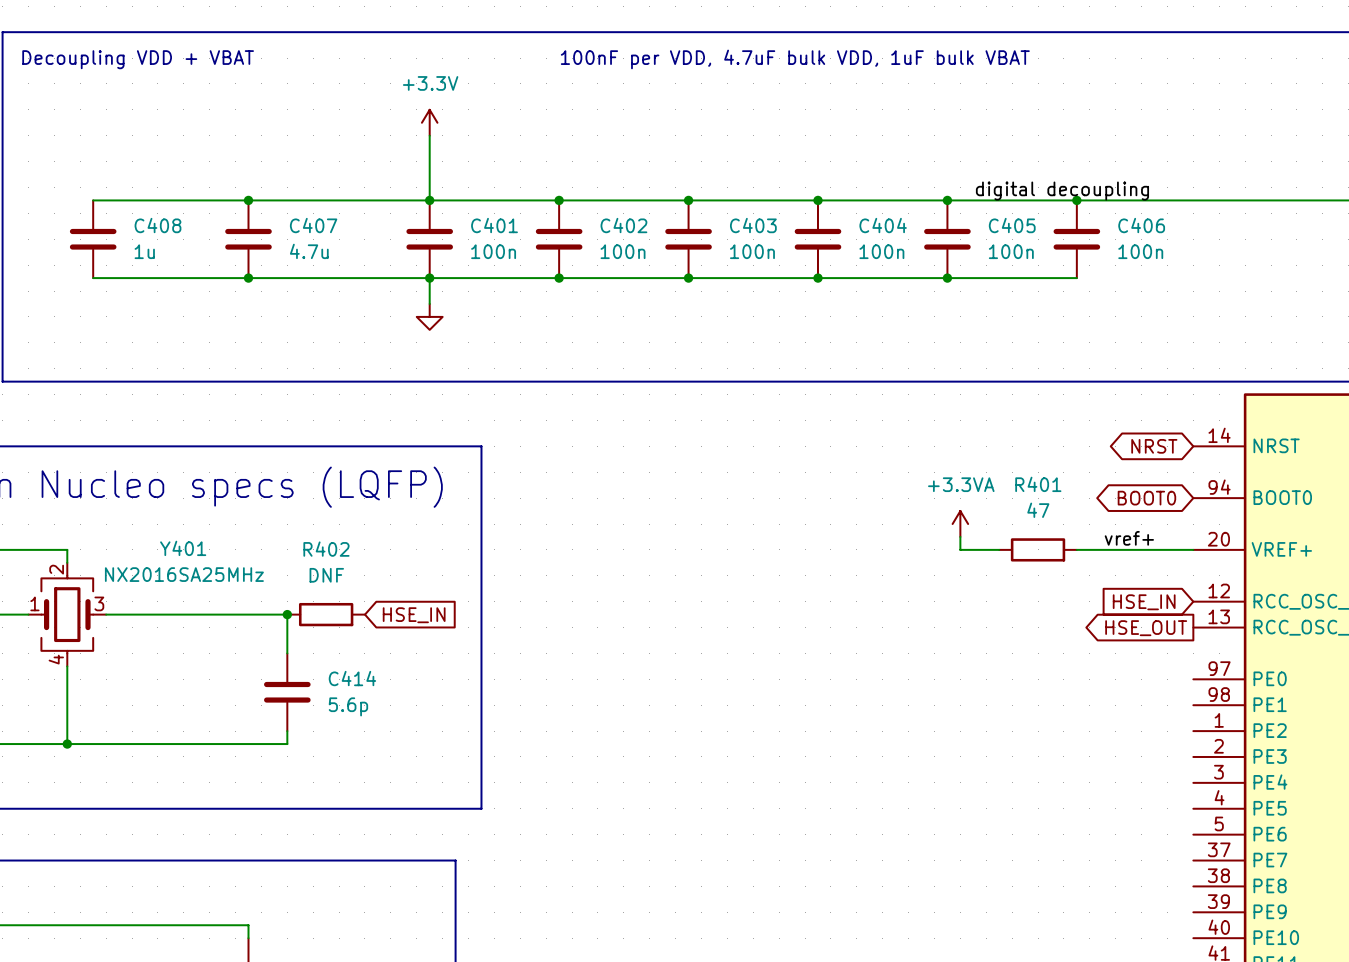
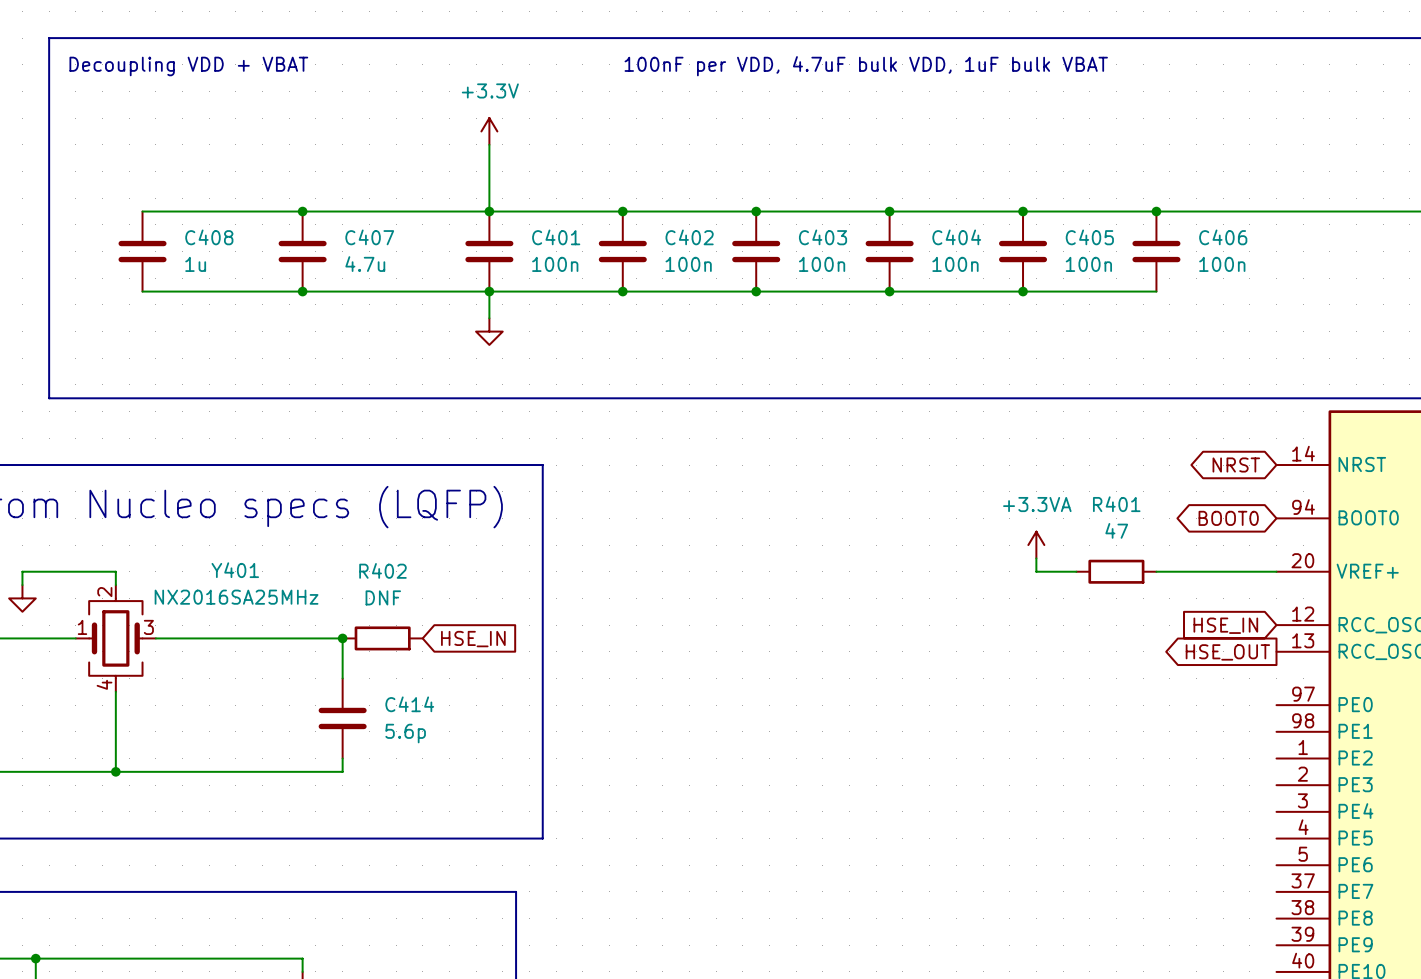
label: digital decoupling (1062, 191) -> none
label: vref+ (1129, 538) -> none

